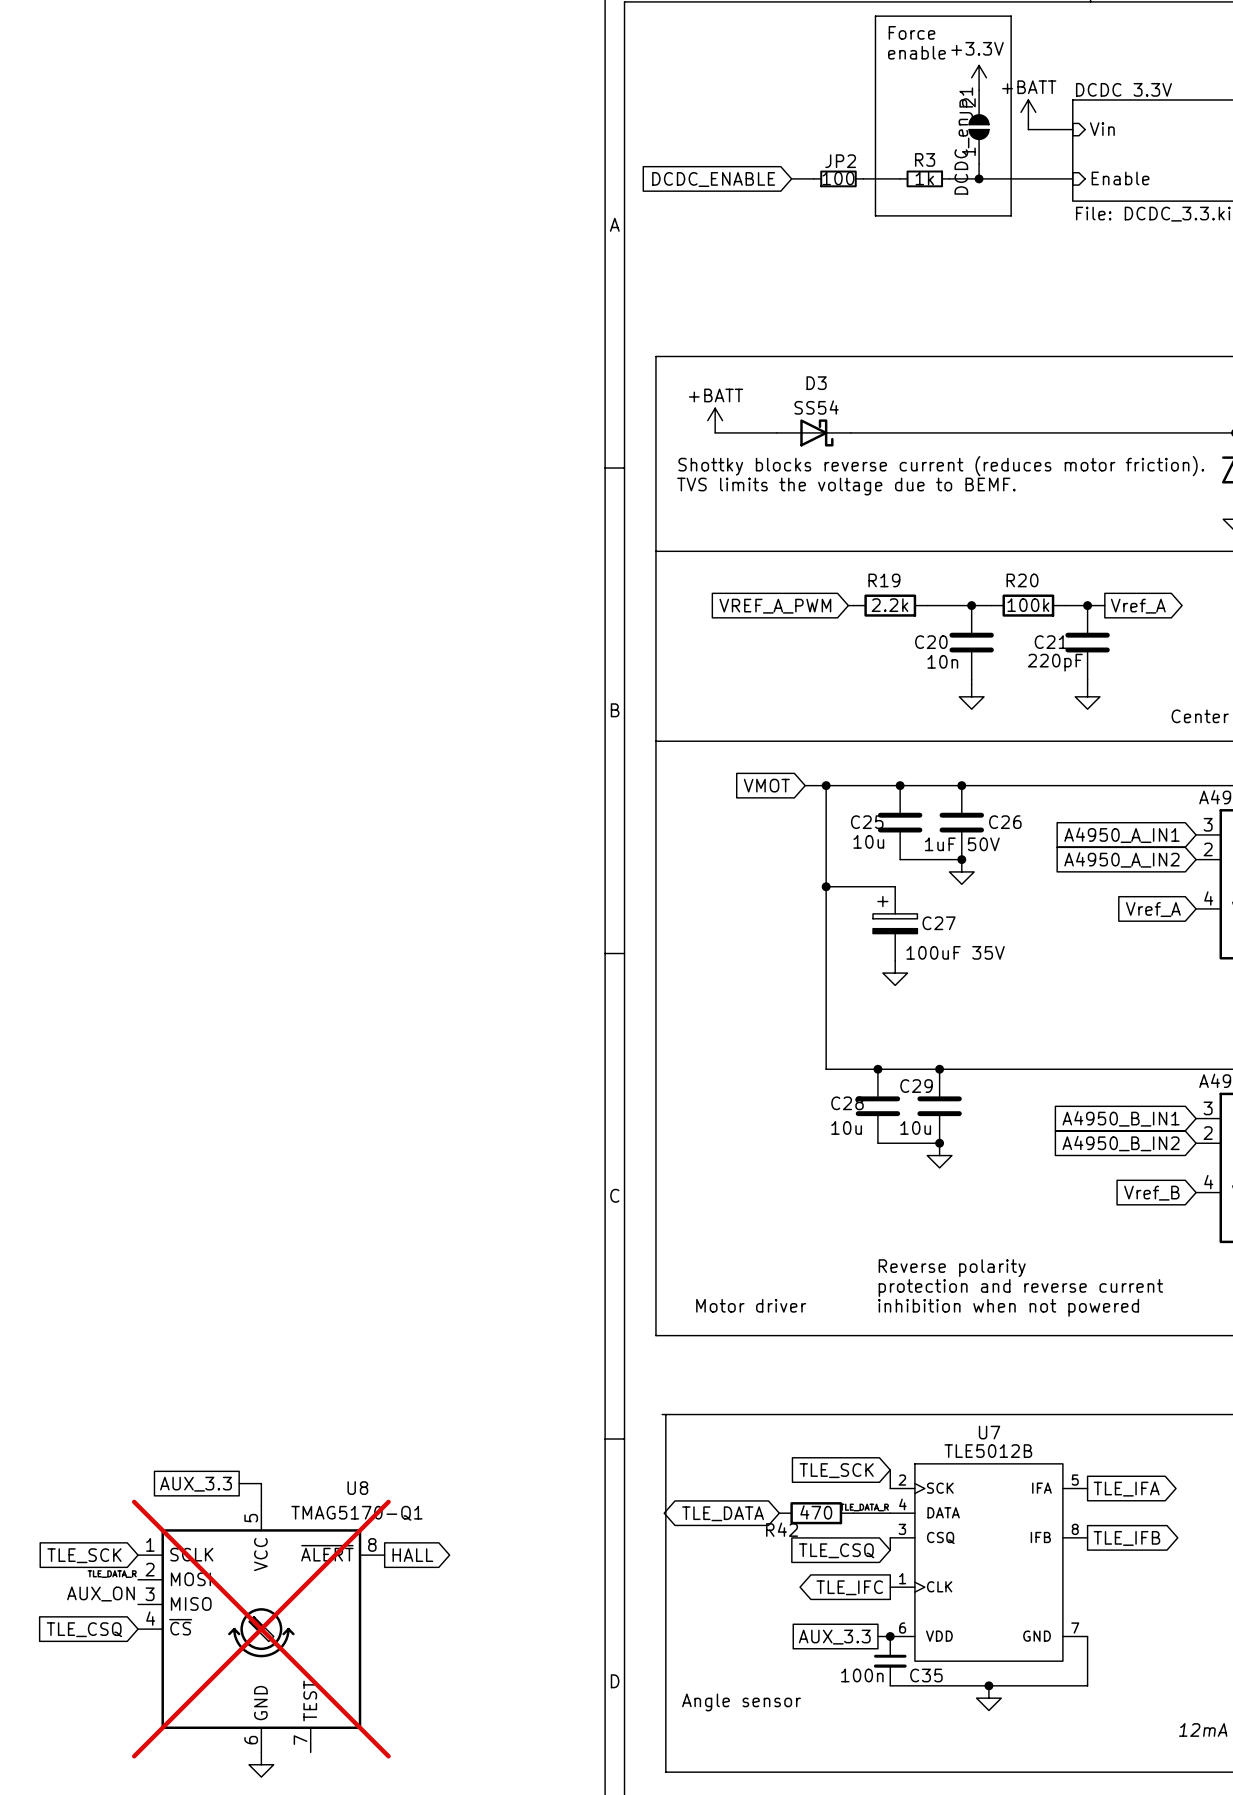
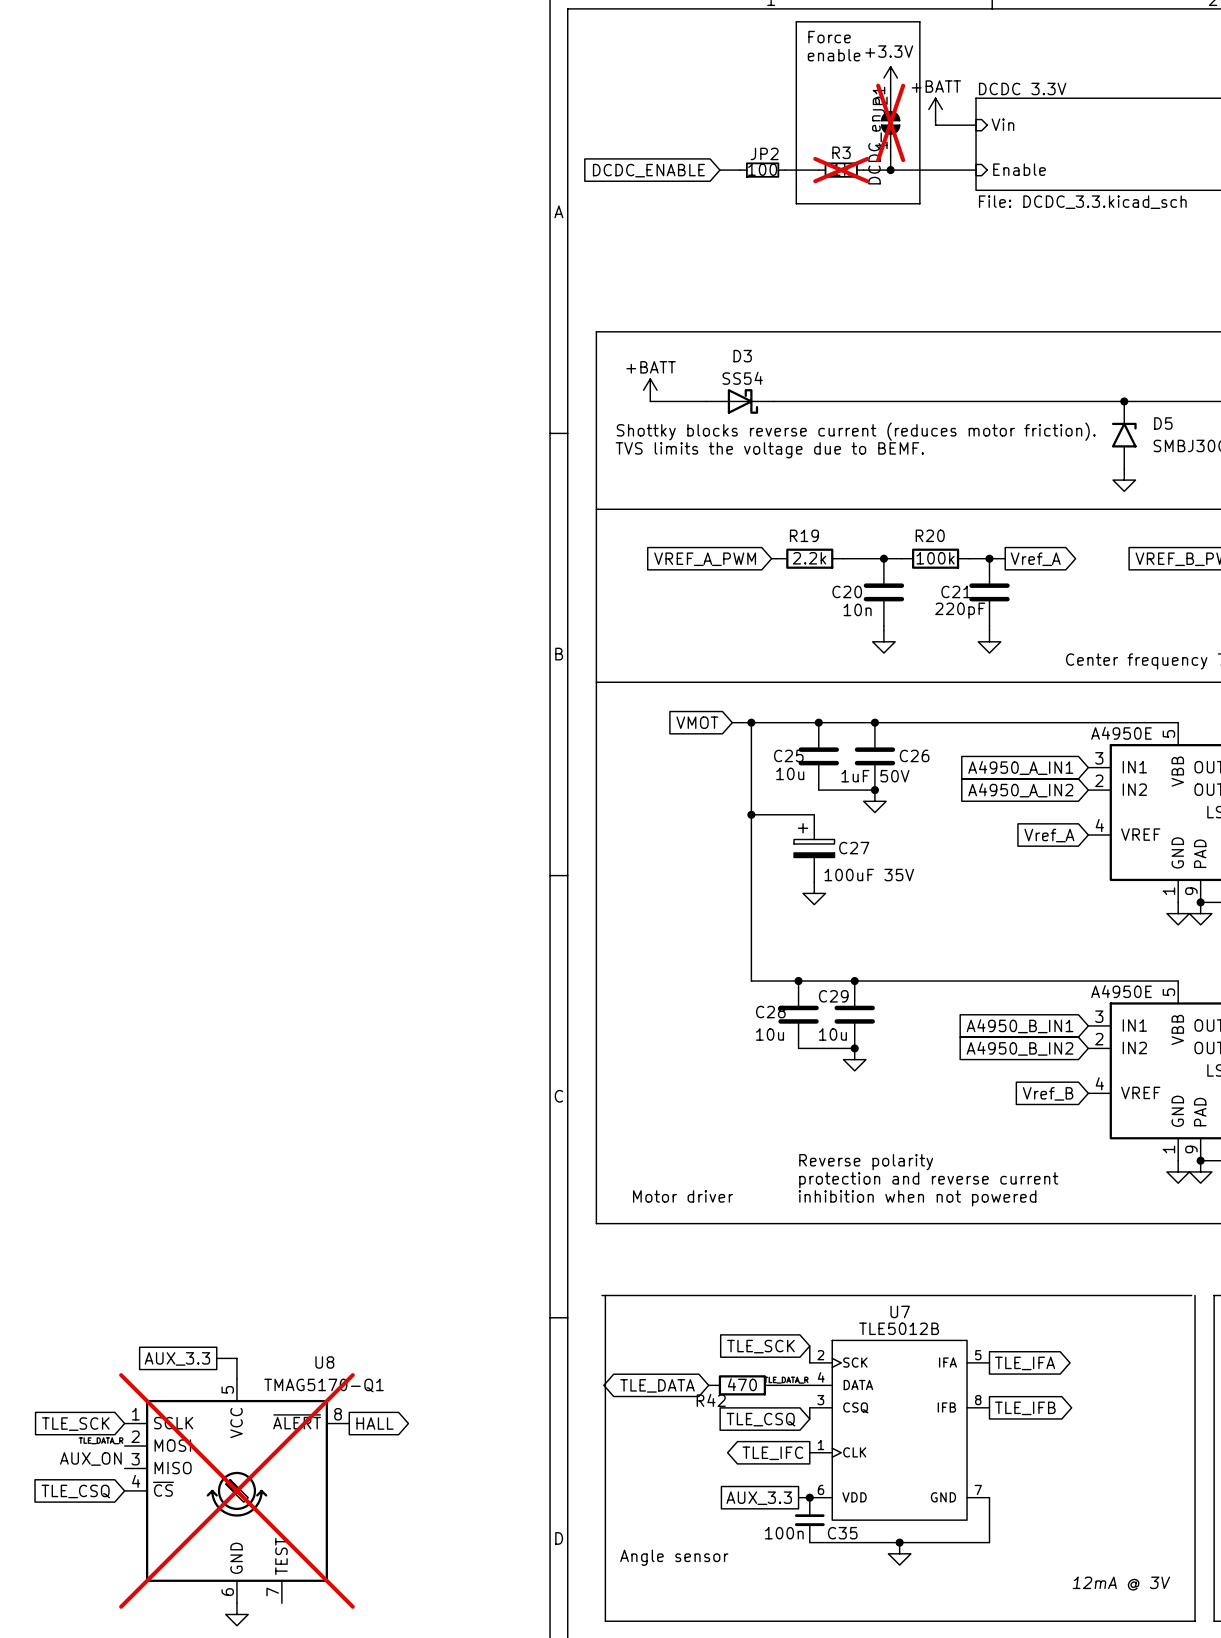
JP1 do-not-place cross: none -> (890, 122)
R3 do-not-place cross: none -> (841, 170)

